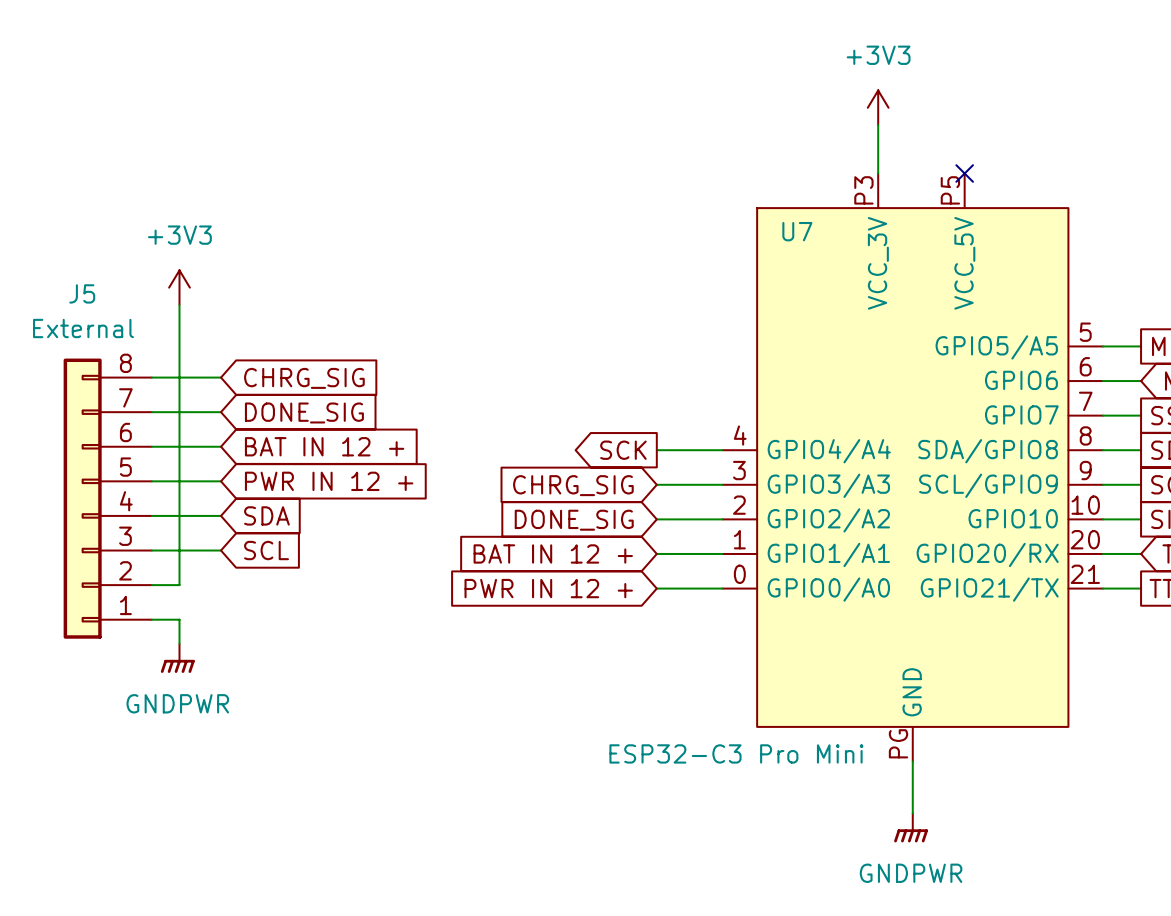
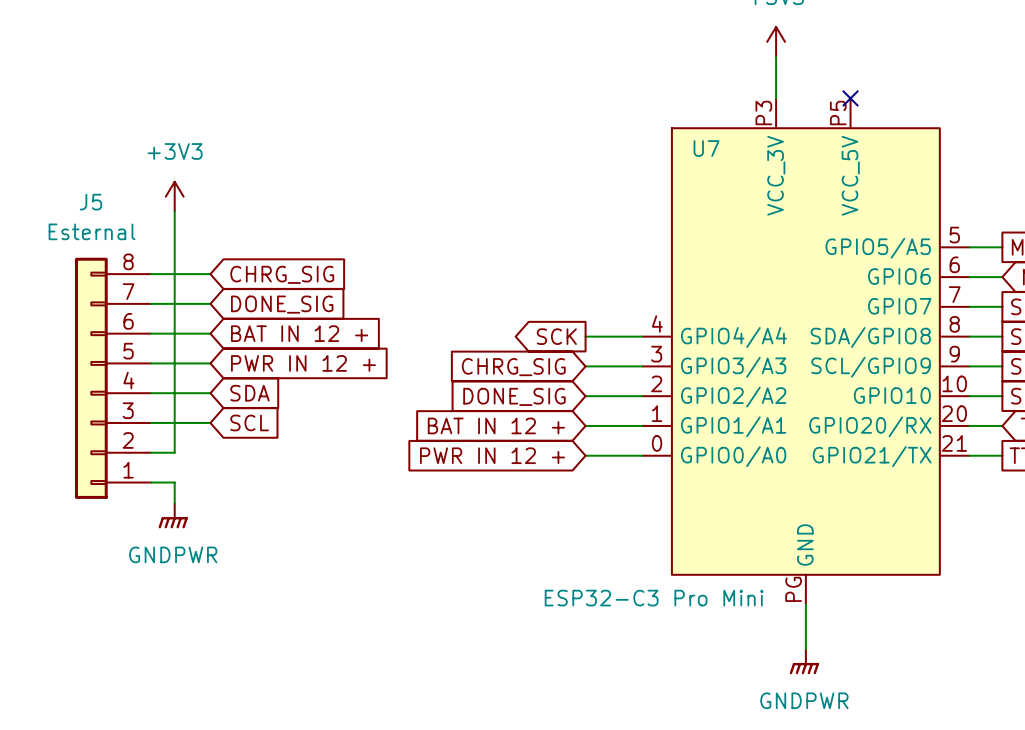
J5 value: External (83, 328) -> Esternal (92, 231)

